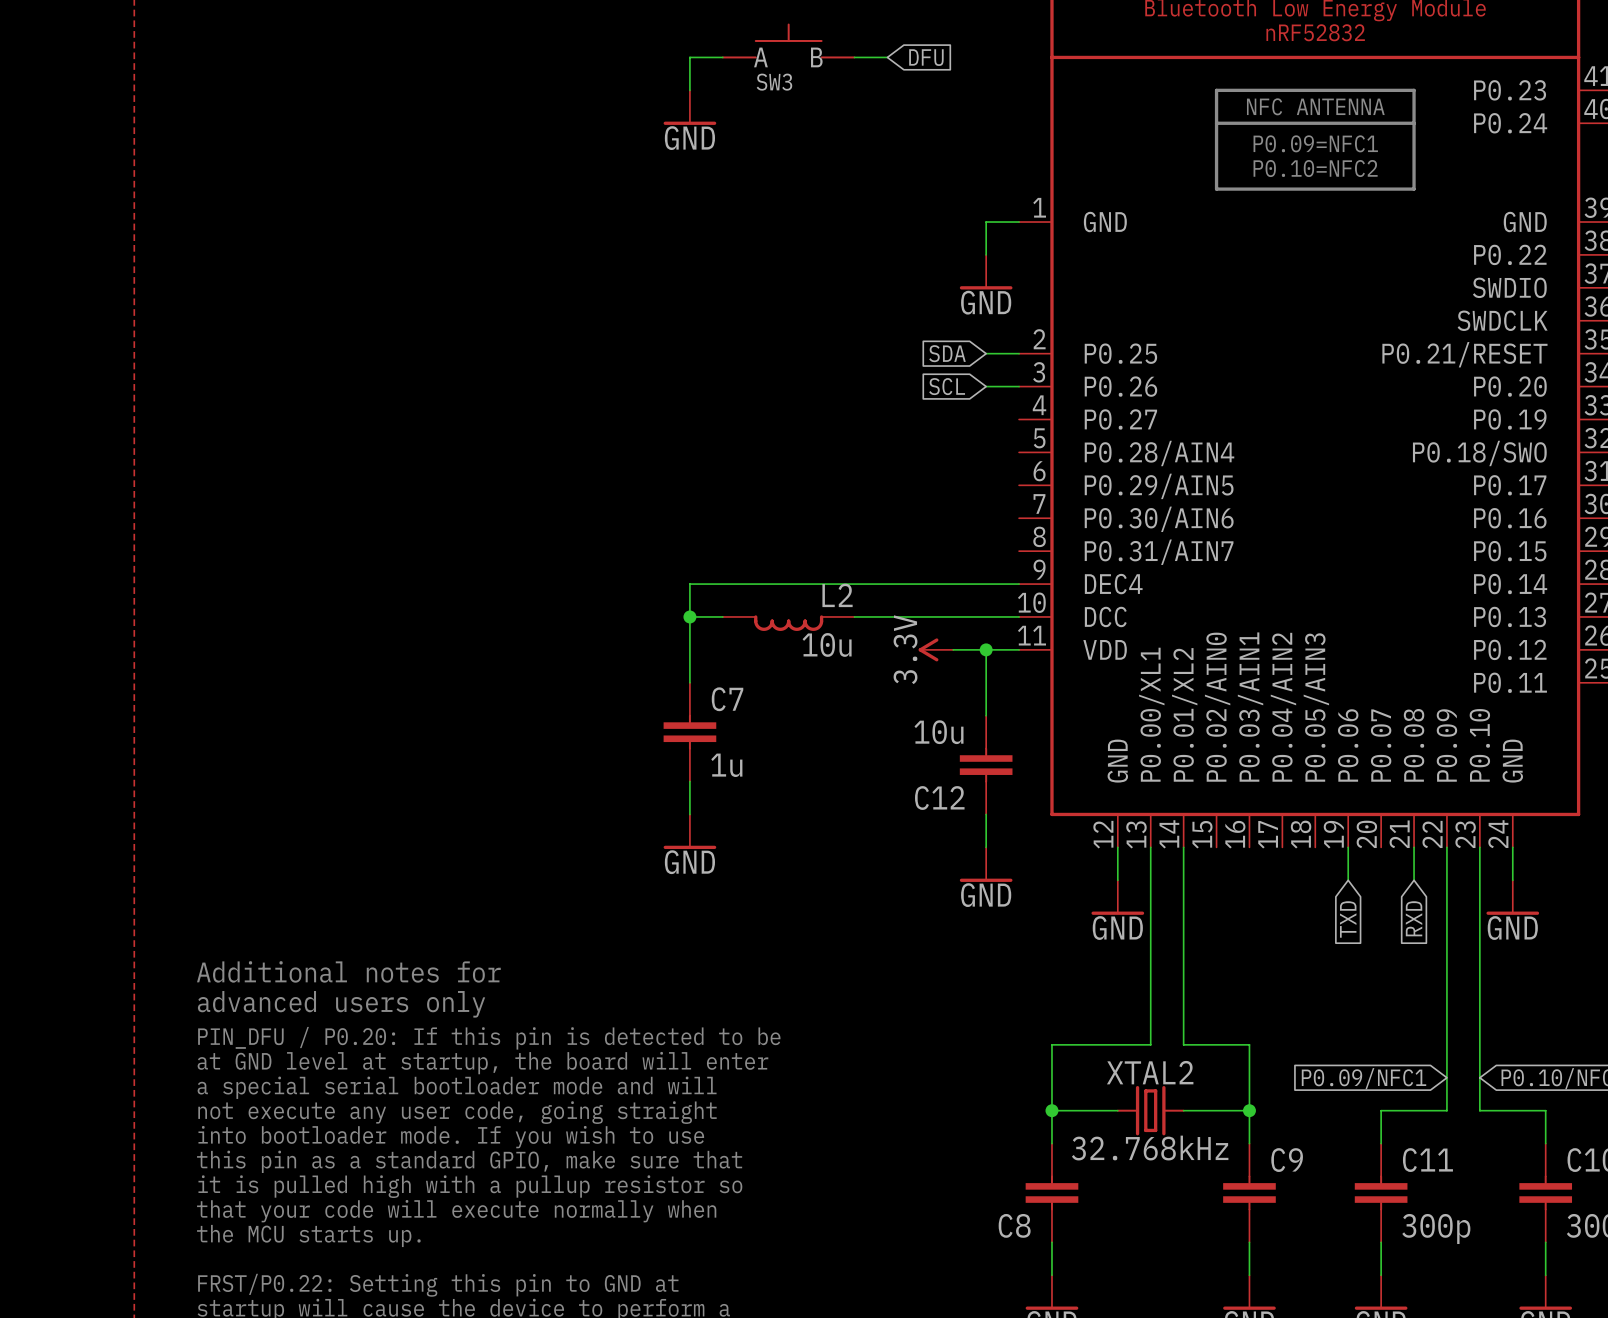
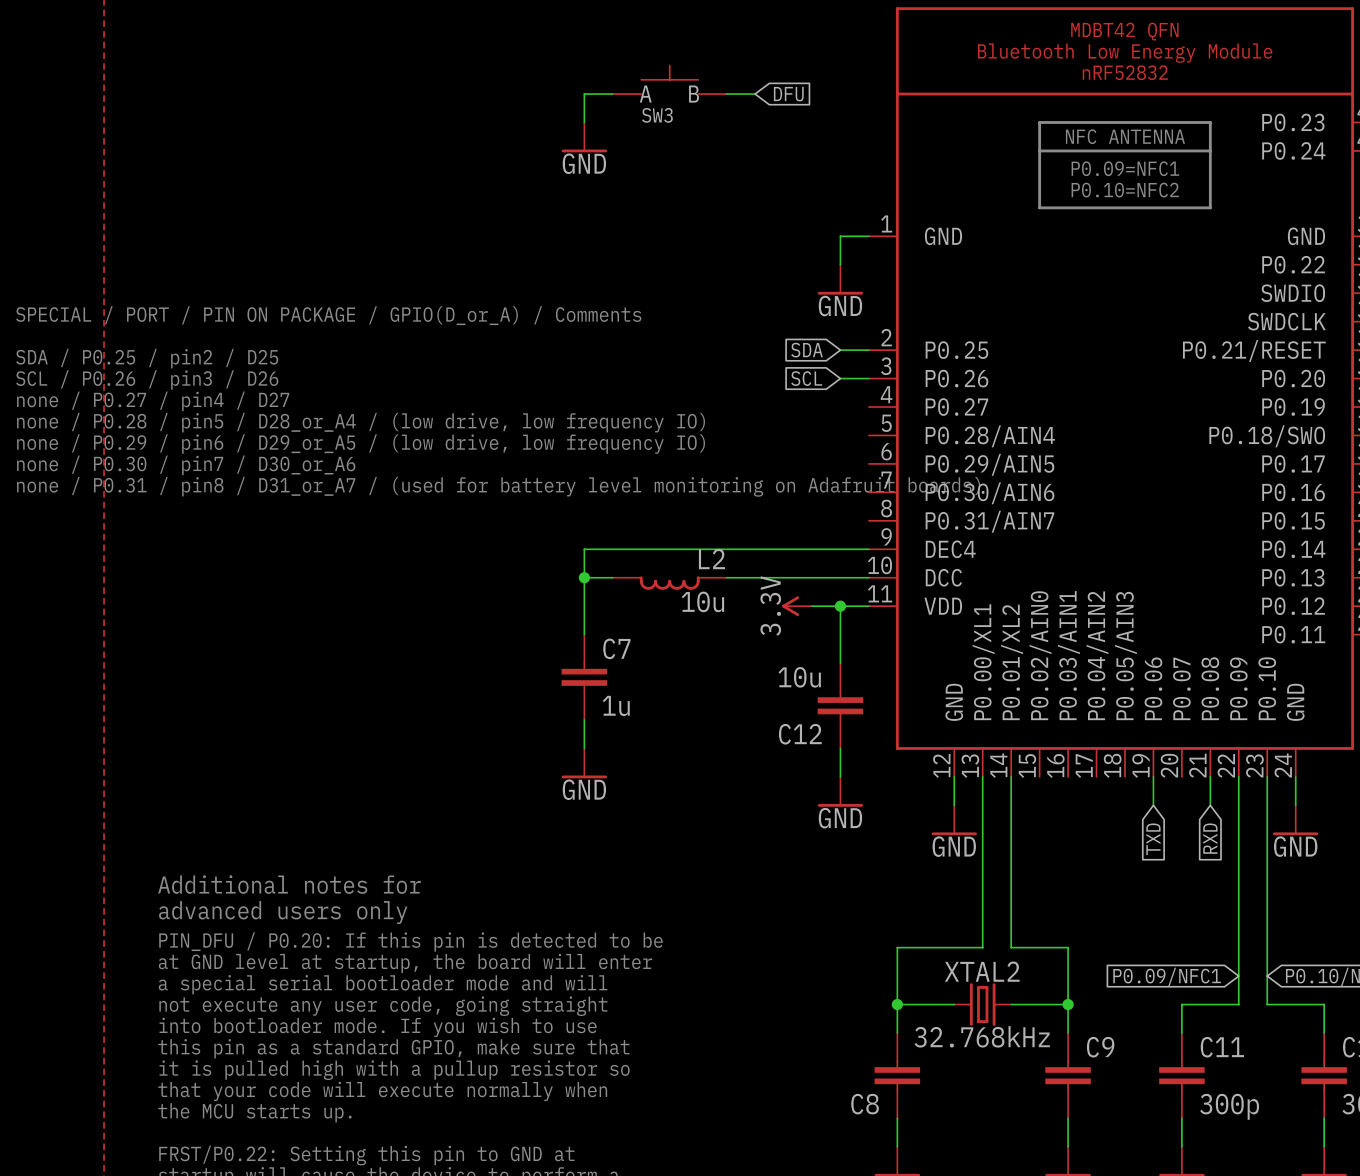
text: none -> SPECIAL / PORT / PIN ON PACKAGE / GPIO(D_or_A) / Comments (328, 315)
text: none -> SDA / P0.25 / pin2 / D25 (147, 358)
text: none -> SCL / P0.26 / pin3 / D26 (147, 379)
text: none -> none / P0.27 / pin4 / D27 (153, 401)
text: none -> none / P0.28 / pin5 / D28_or_A4 / (low drive, low frequency IO) (361, 422)
text: none -> none / P0.29 / pin6 / D29_or_A5 / (low drive, low frequency IO) (361, 443)
text: none -> none / P0.30 / pin7 / D30_or_A6 (186, 465)
text: none -> none / P0.31 / pin8 / D31_or_A7 / (used for battery level monitoring on Adafruit boards) (498, 486)

